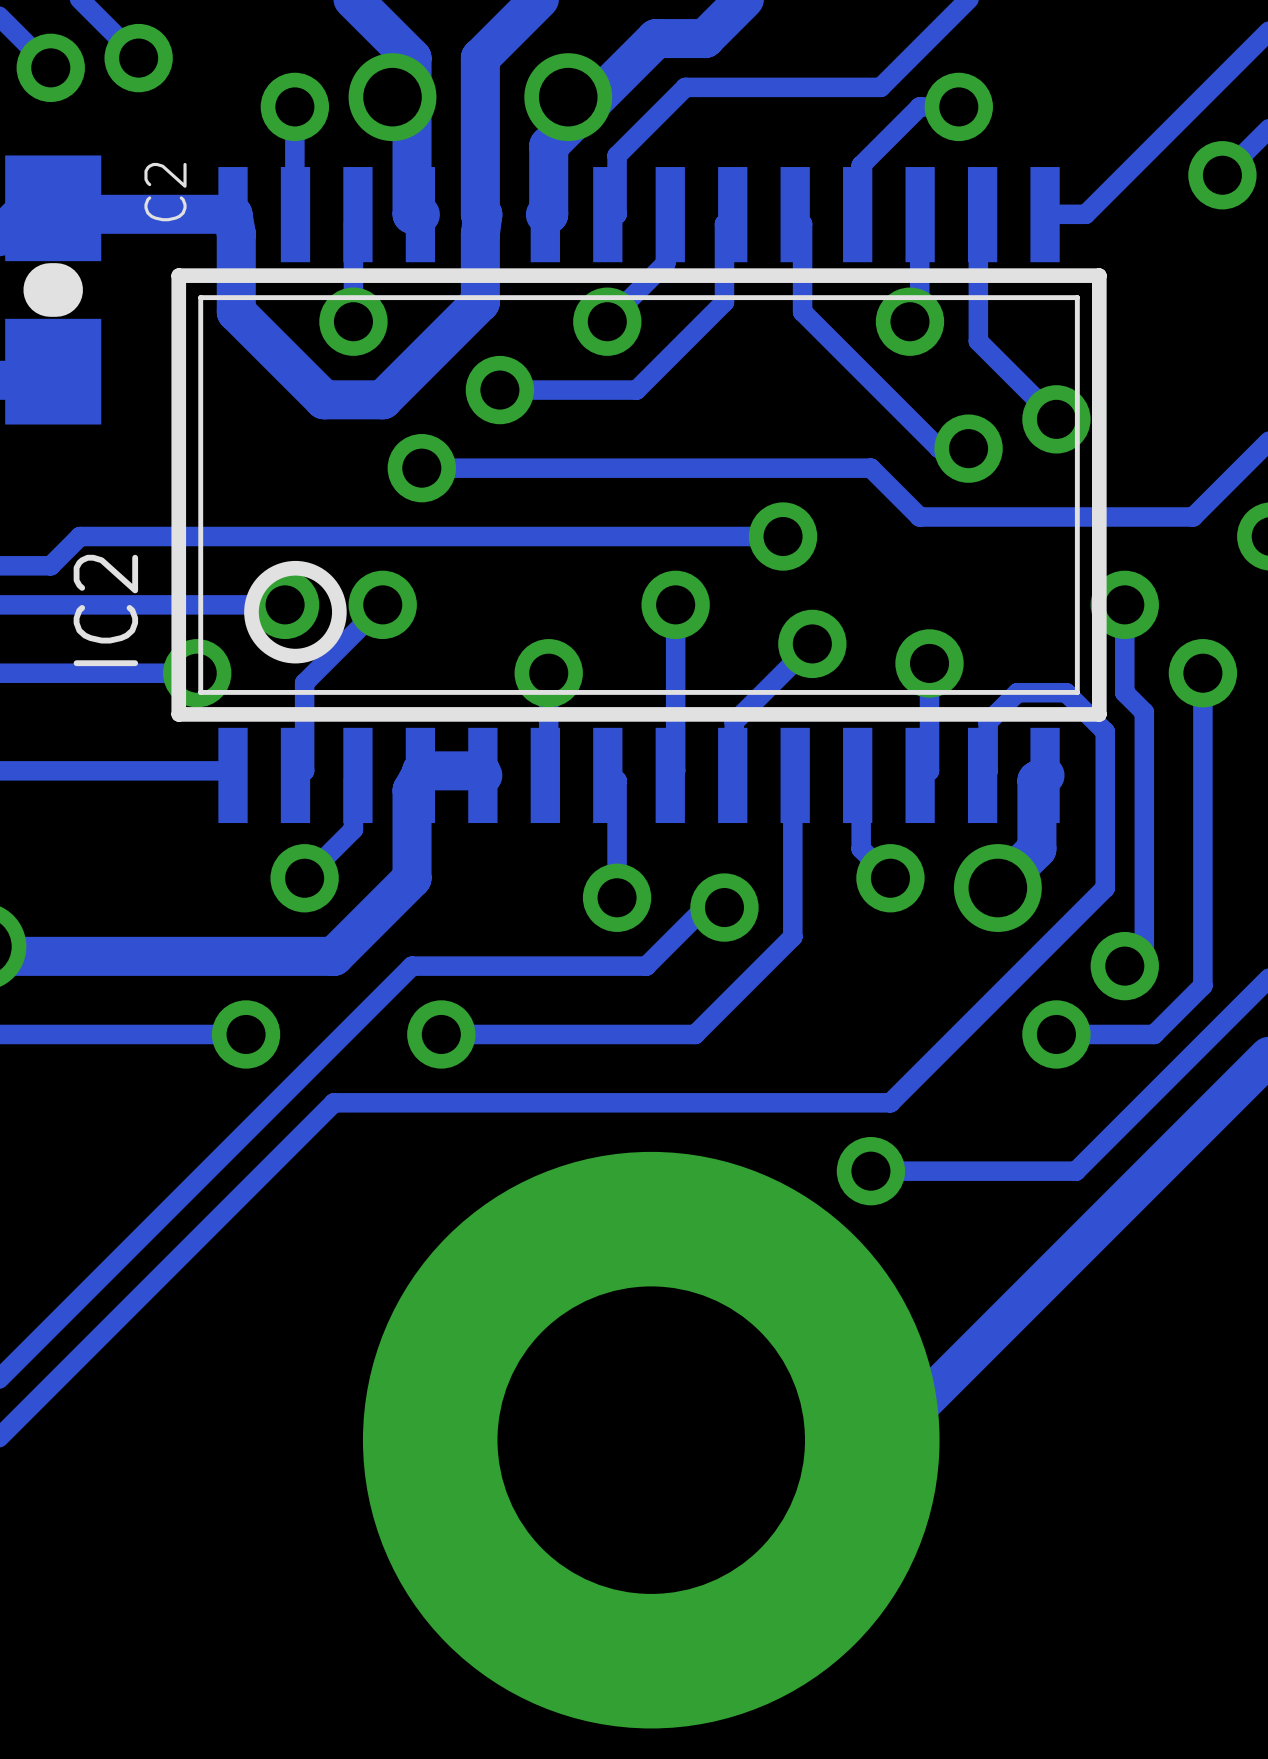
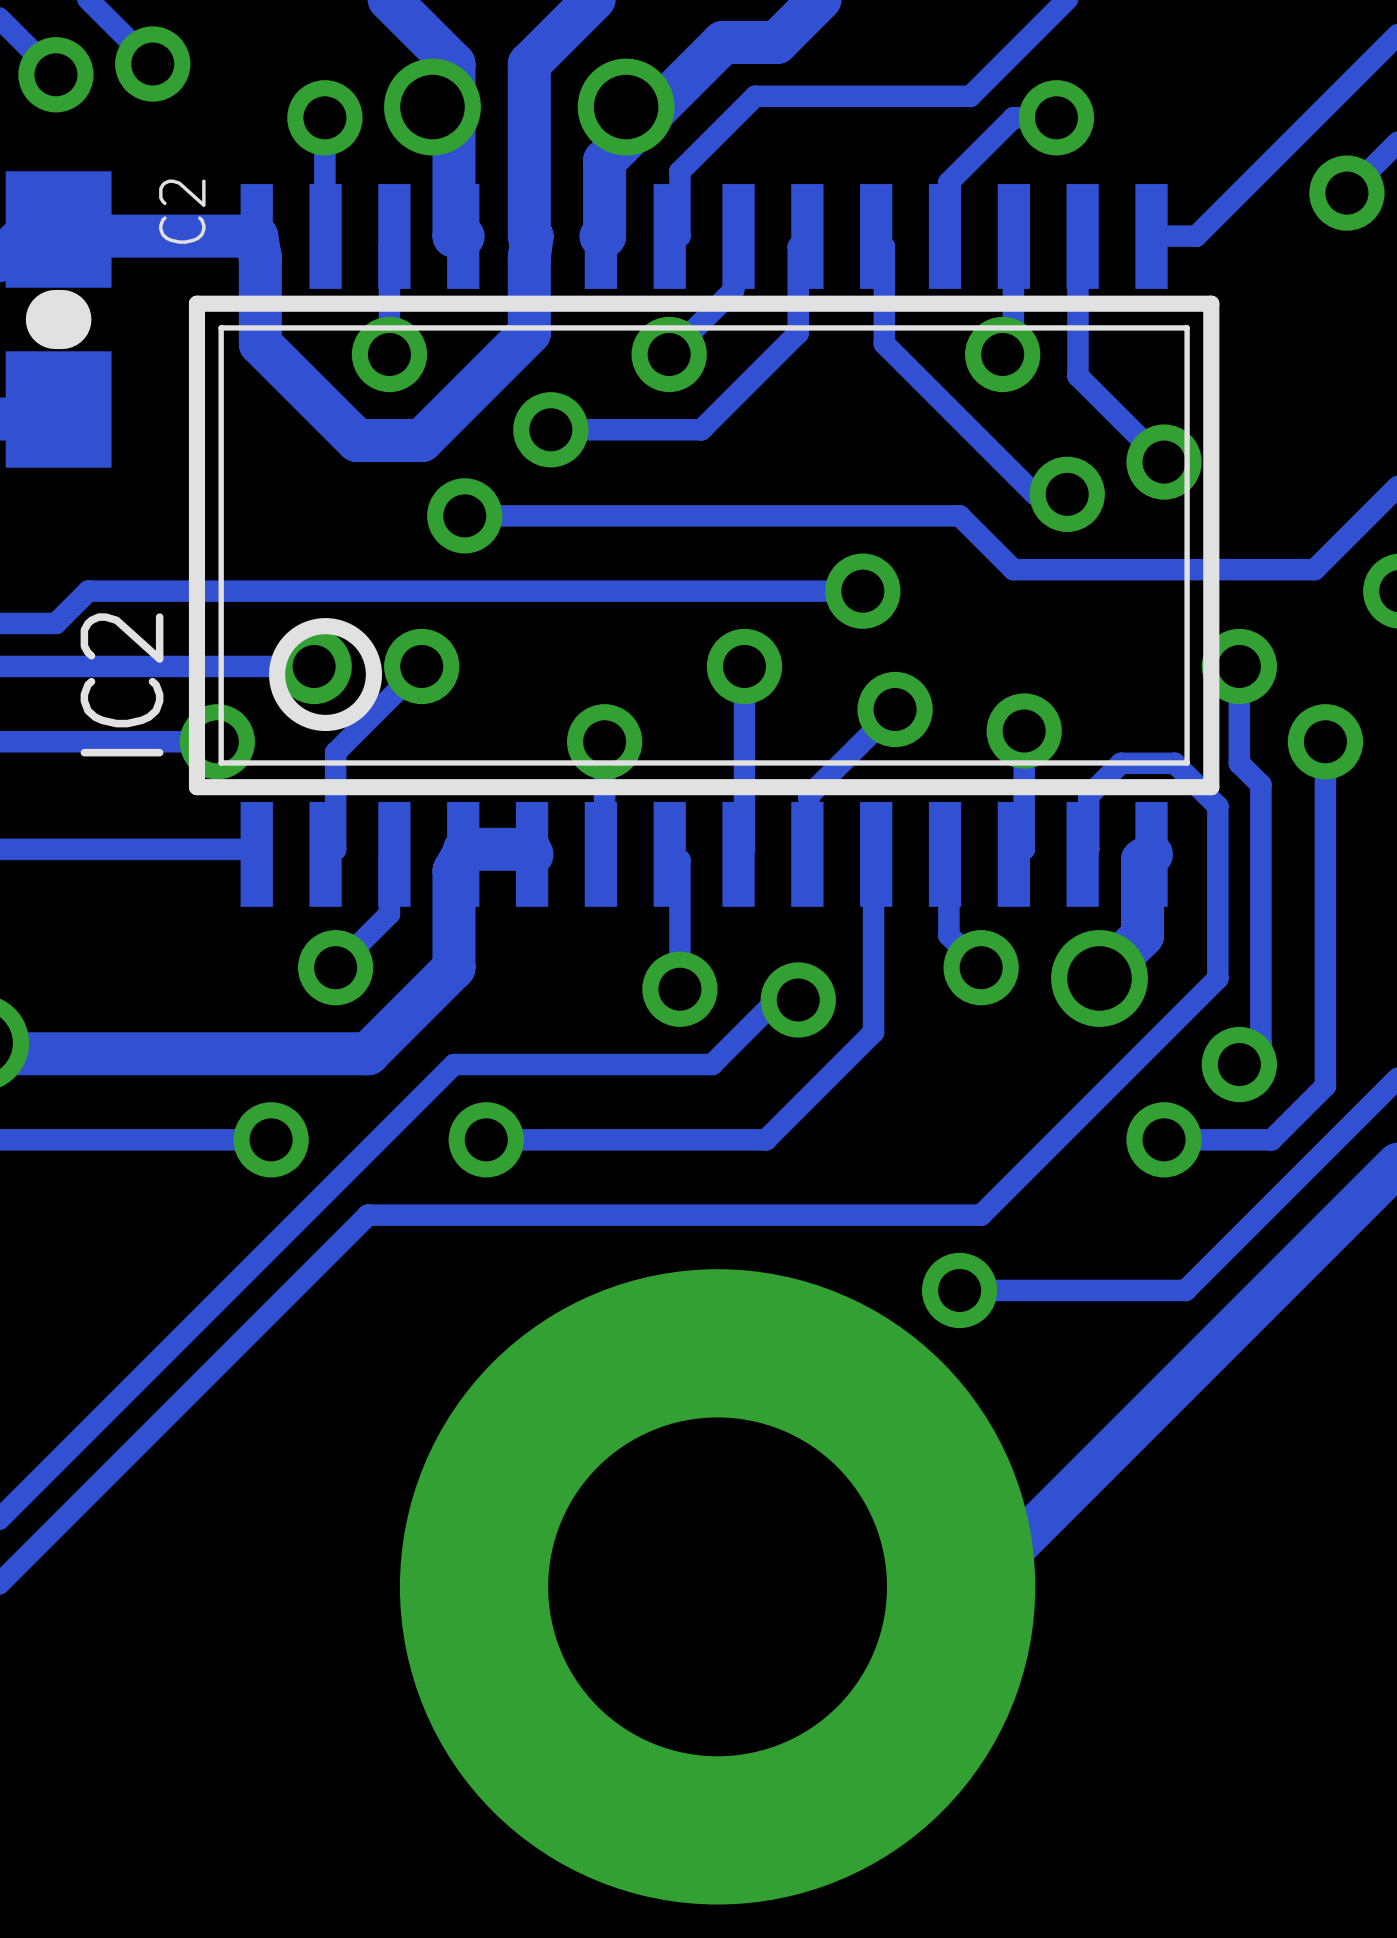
IC2 name position: IC2 (105, 610) -> IC2 (122, 684)

